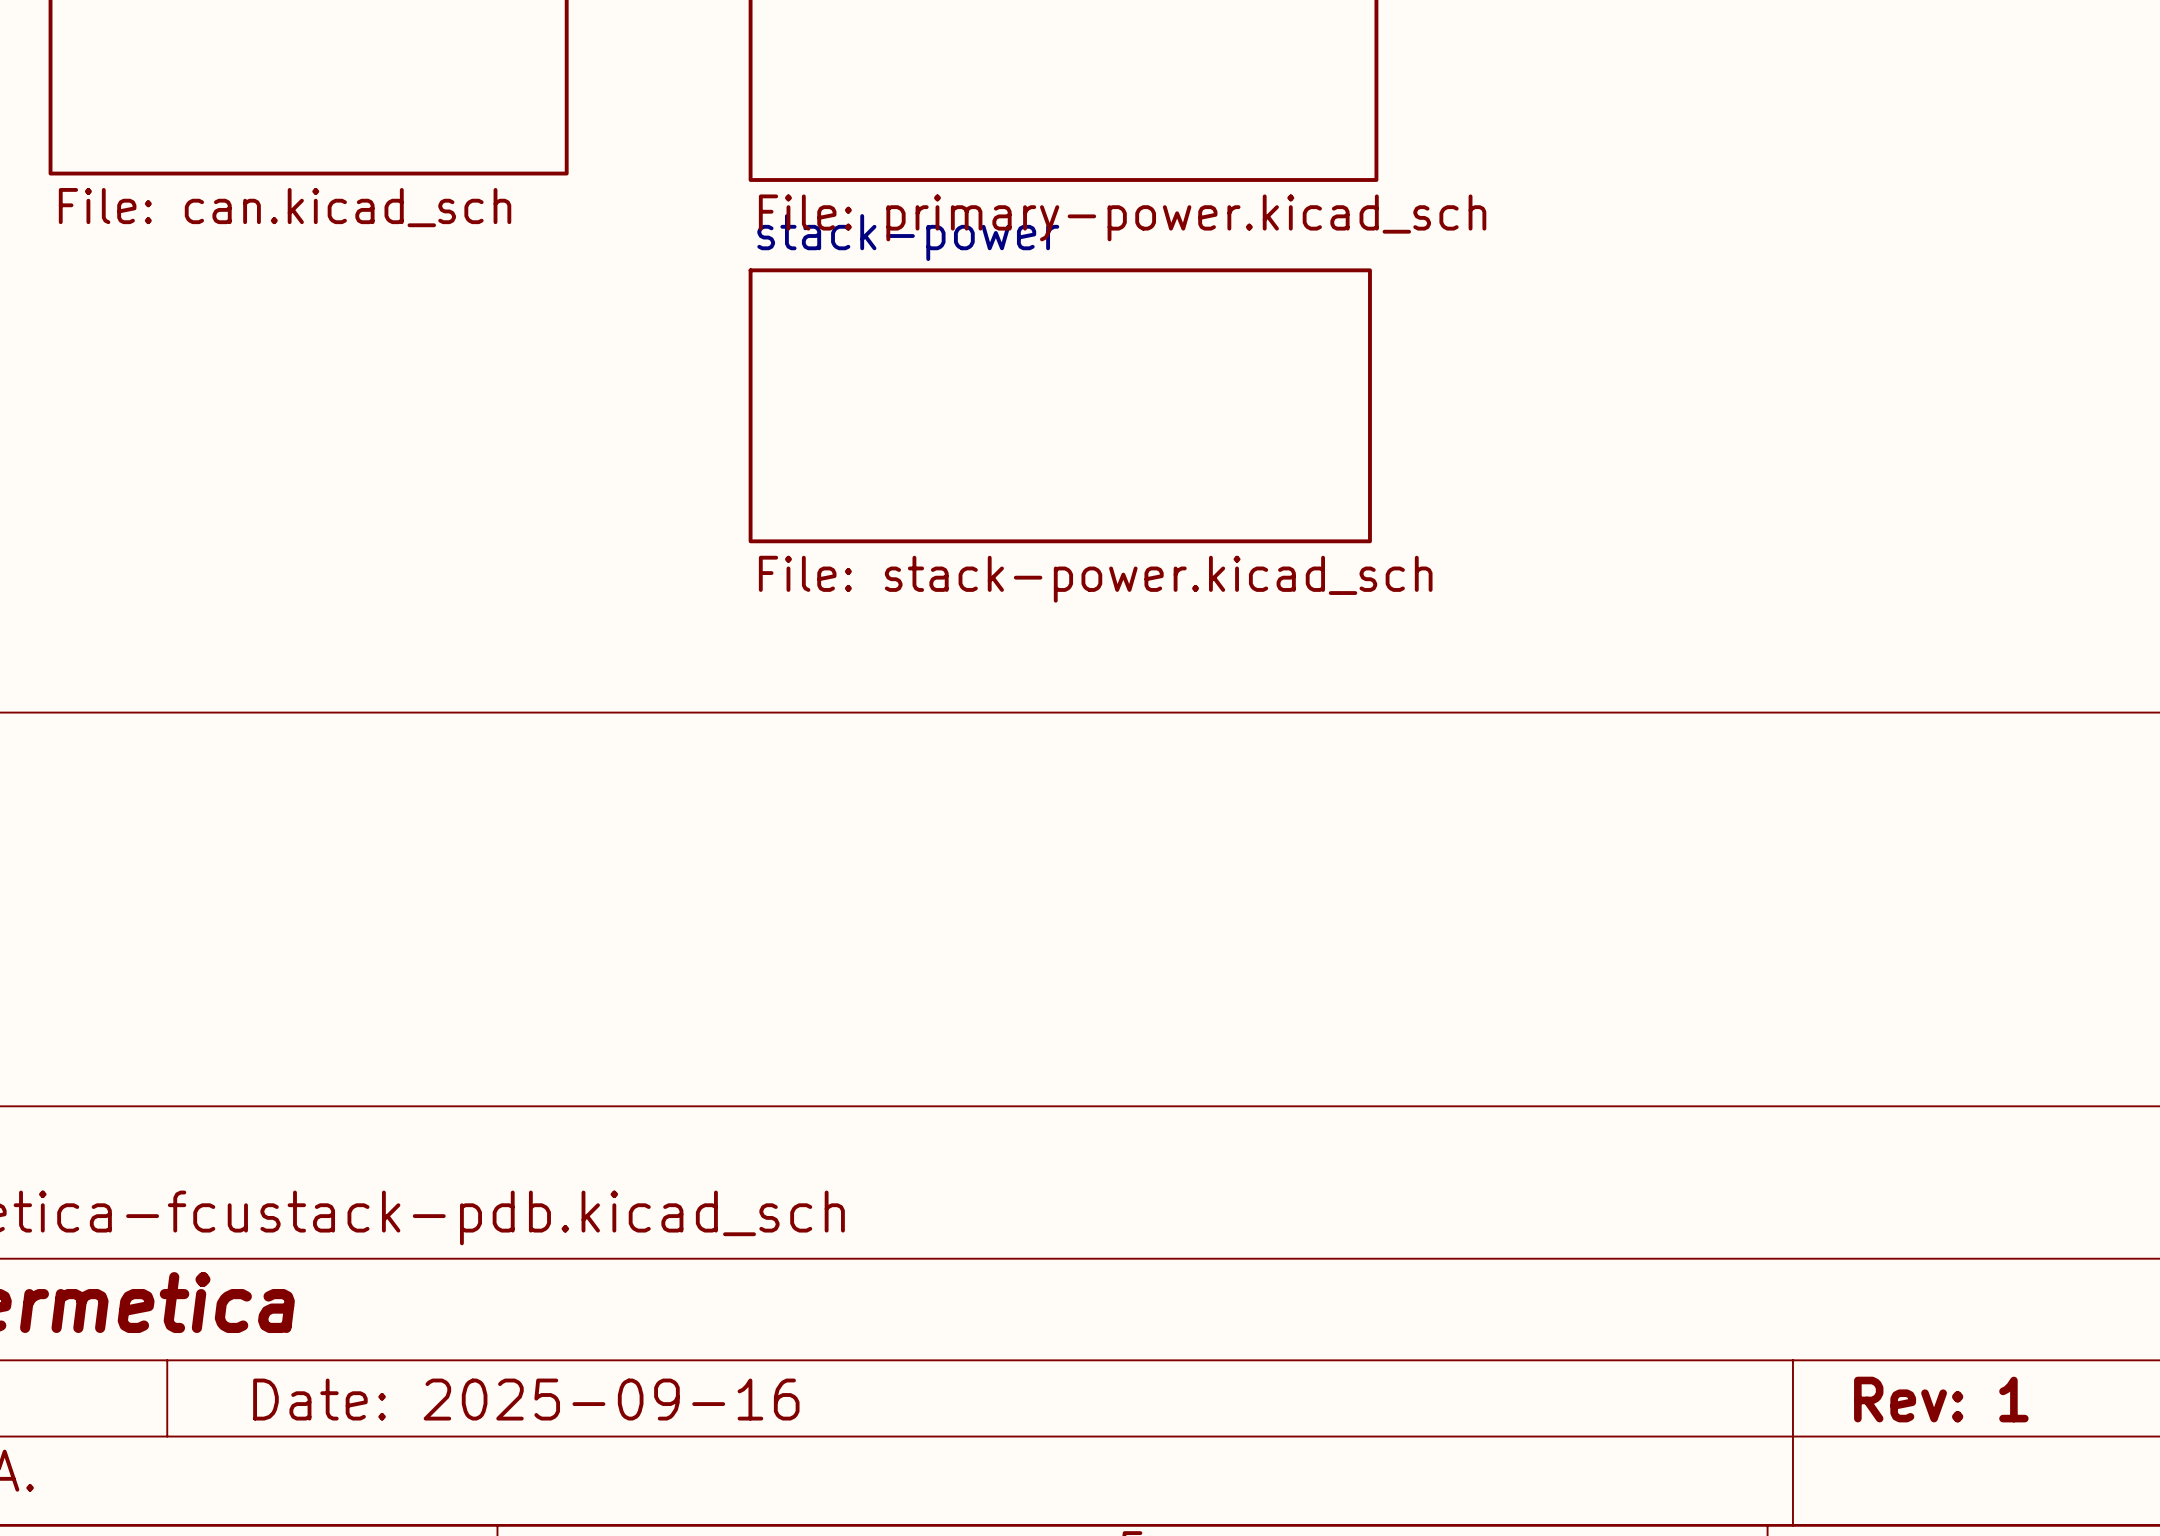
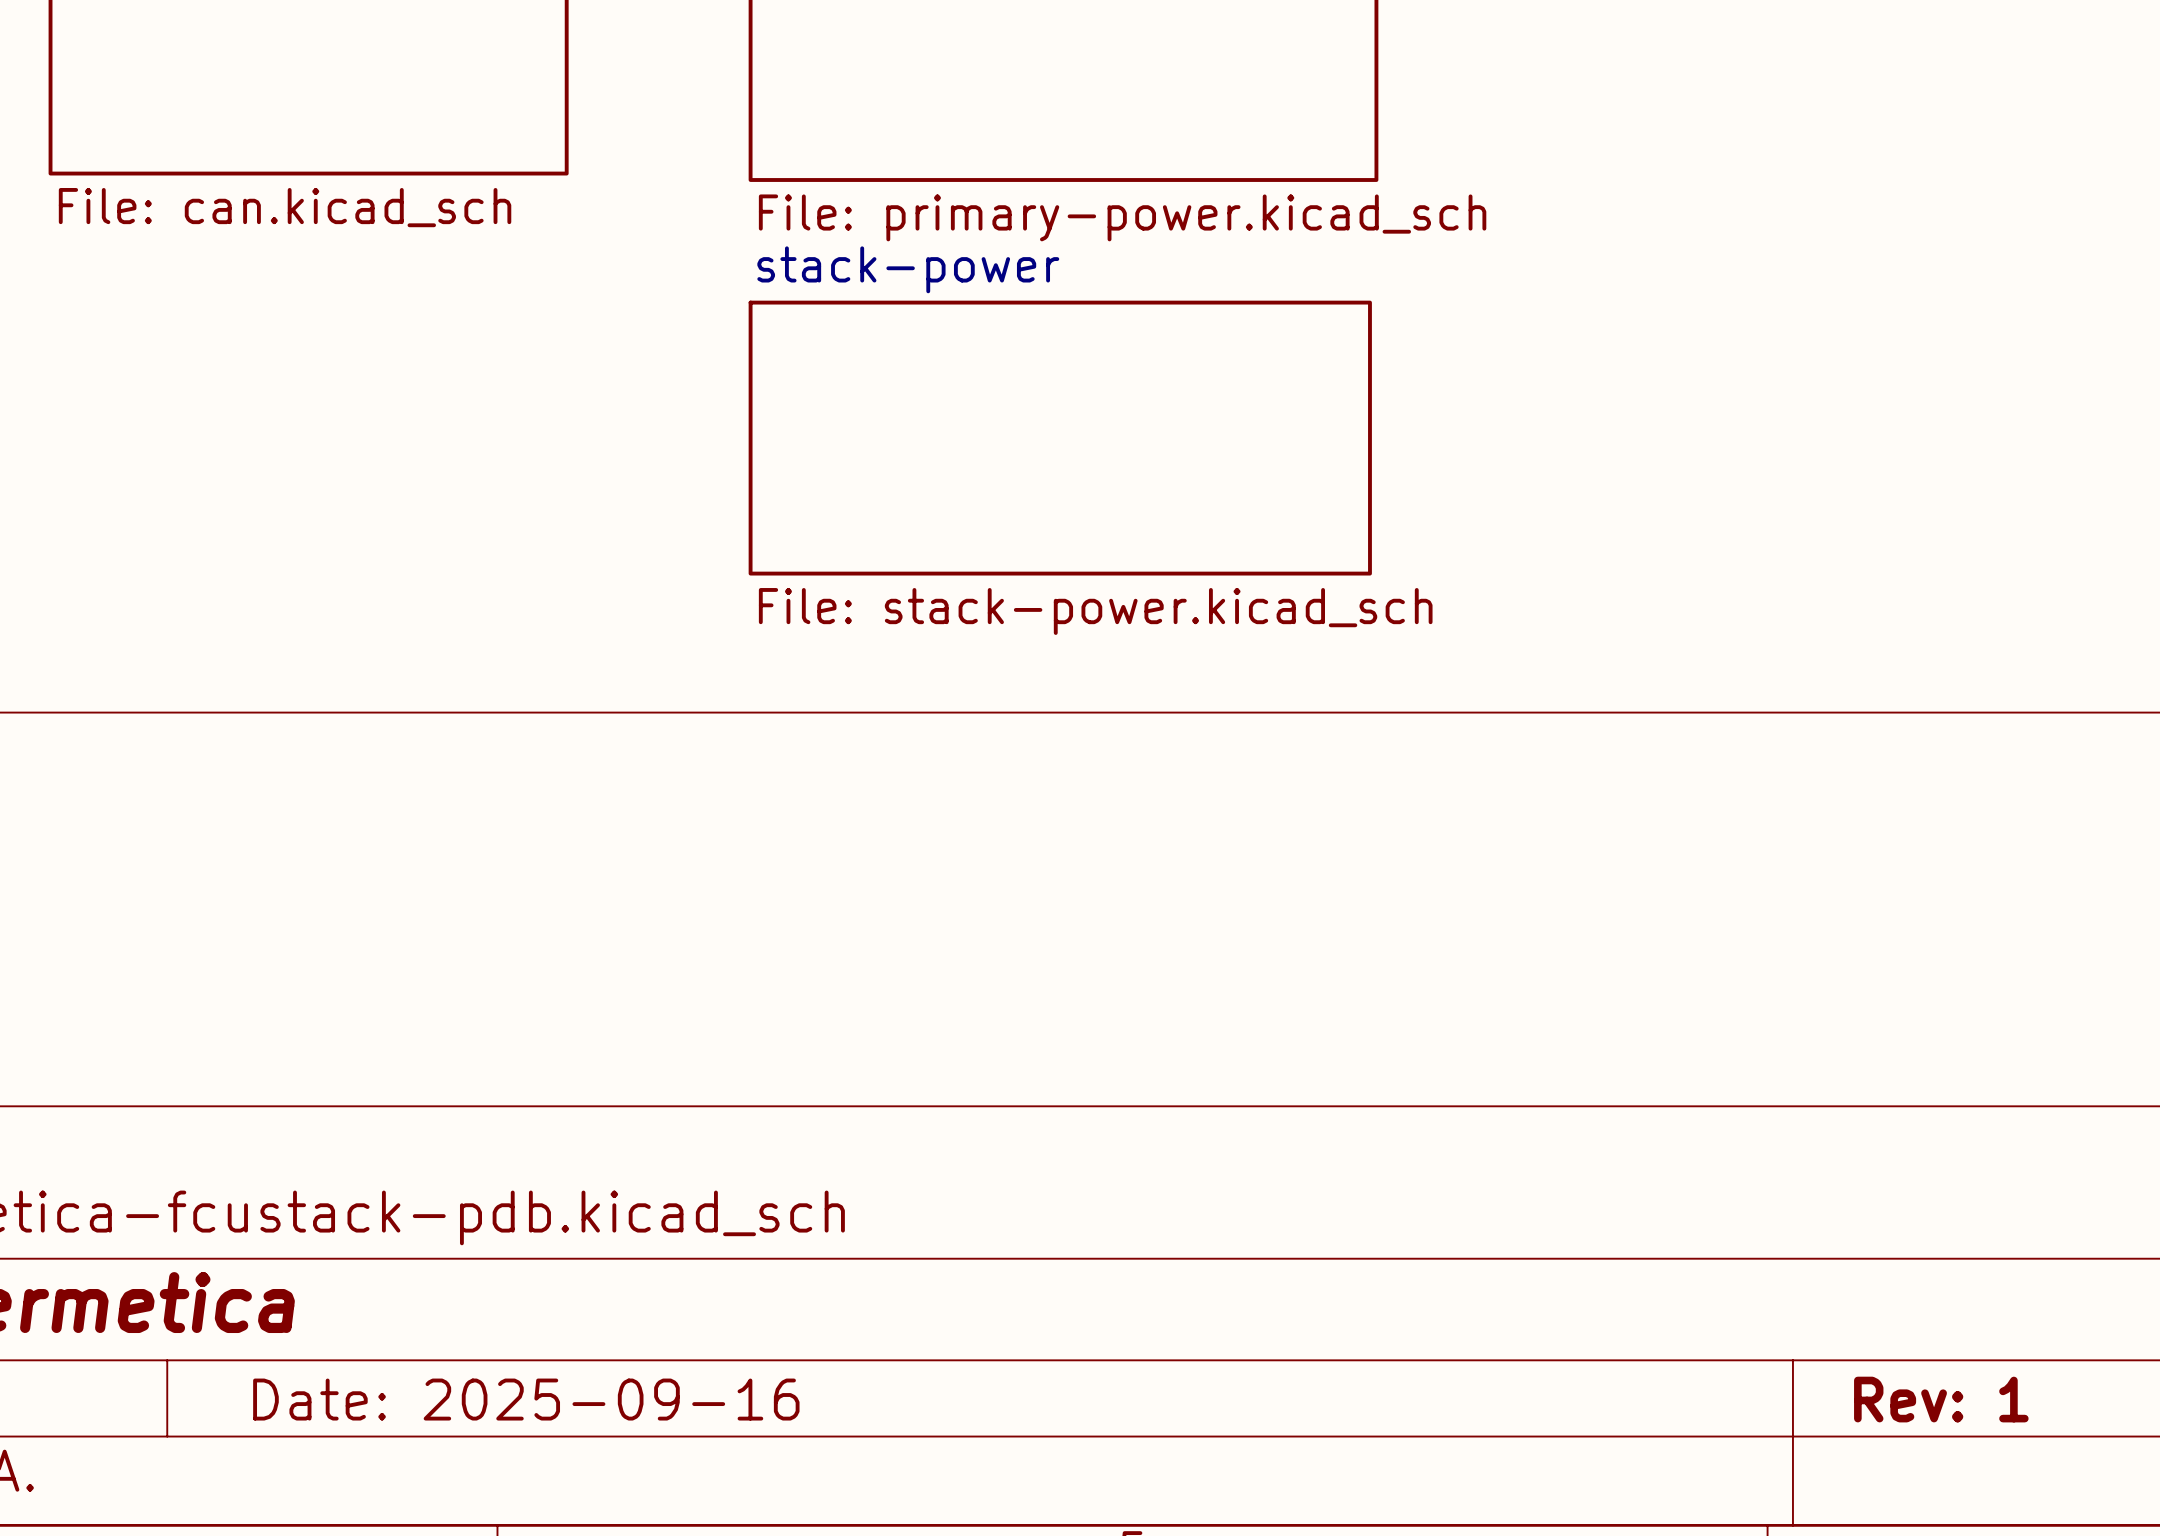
sheet stack-power position: (1060, 405) -> (1060, 438)

